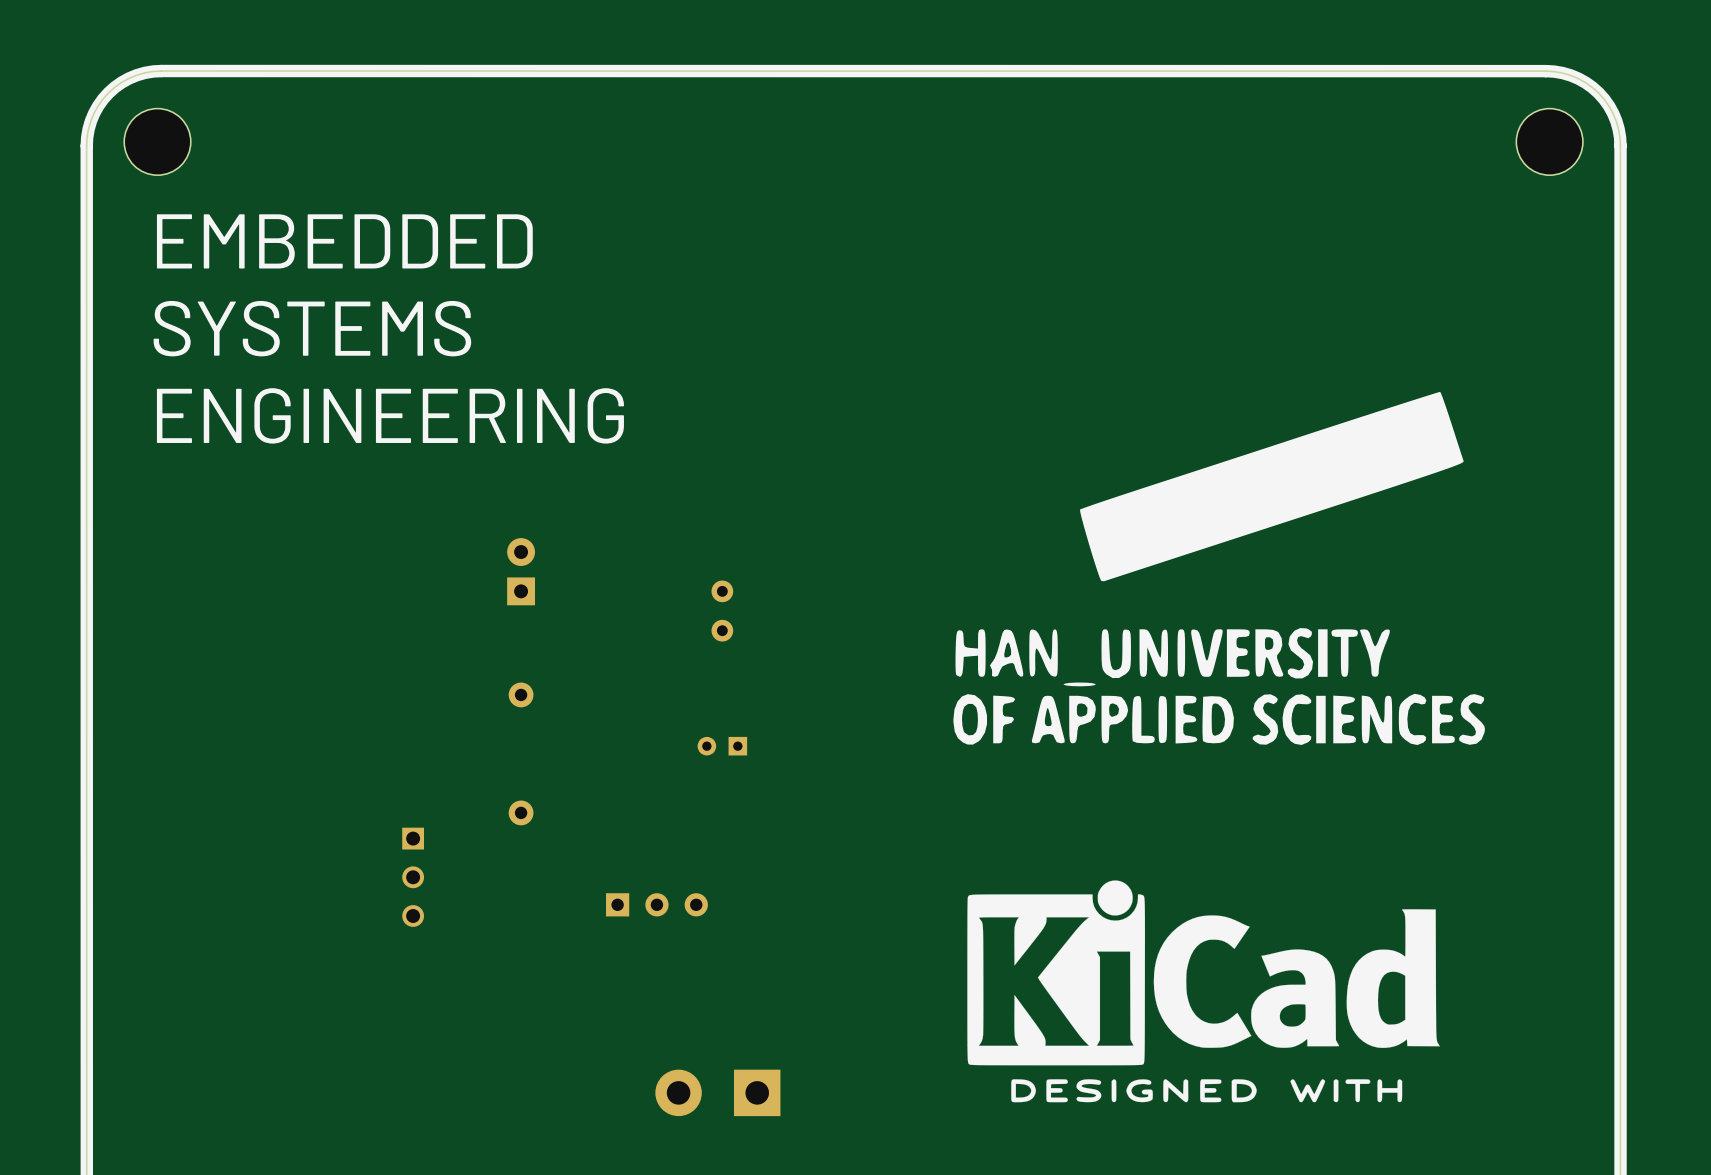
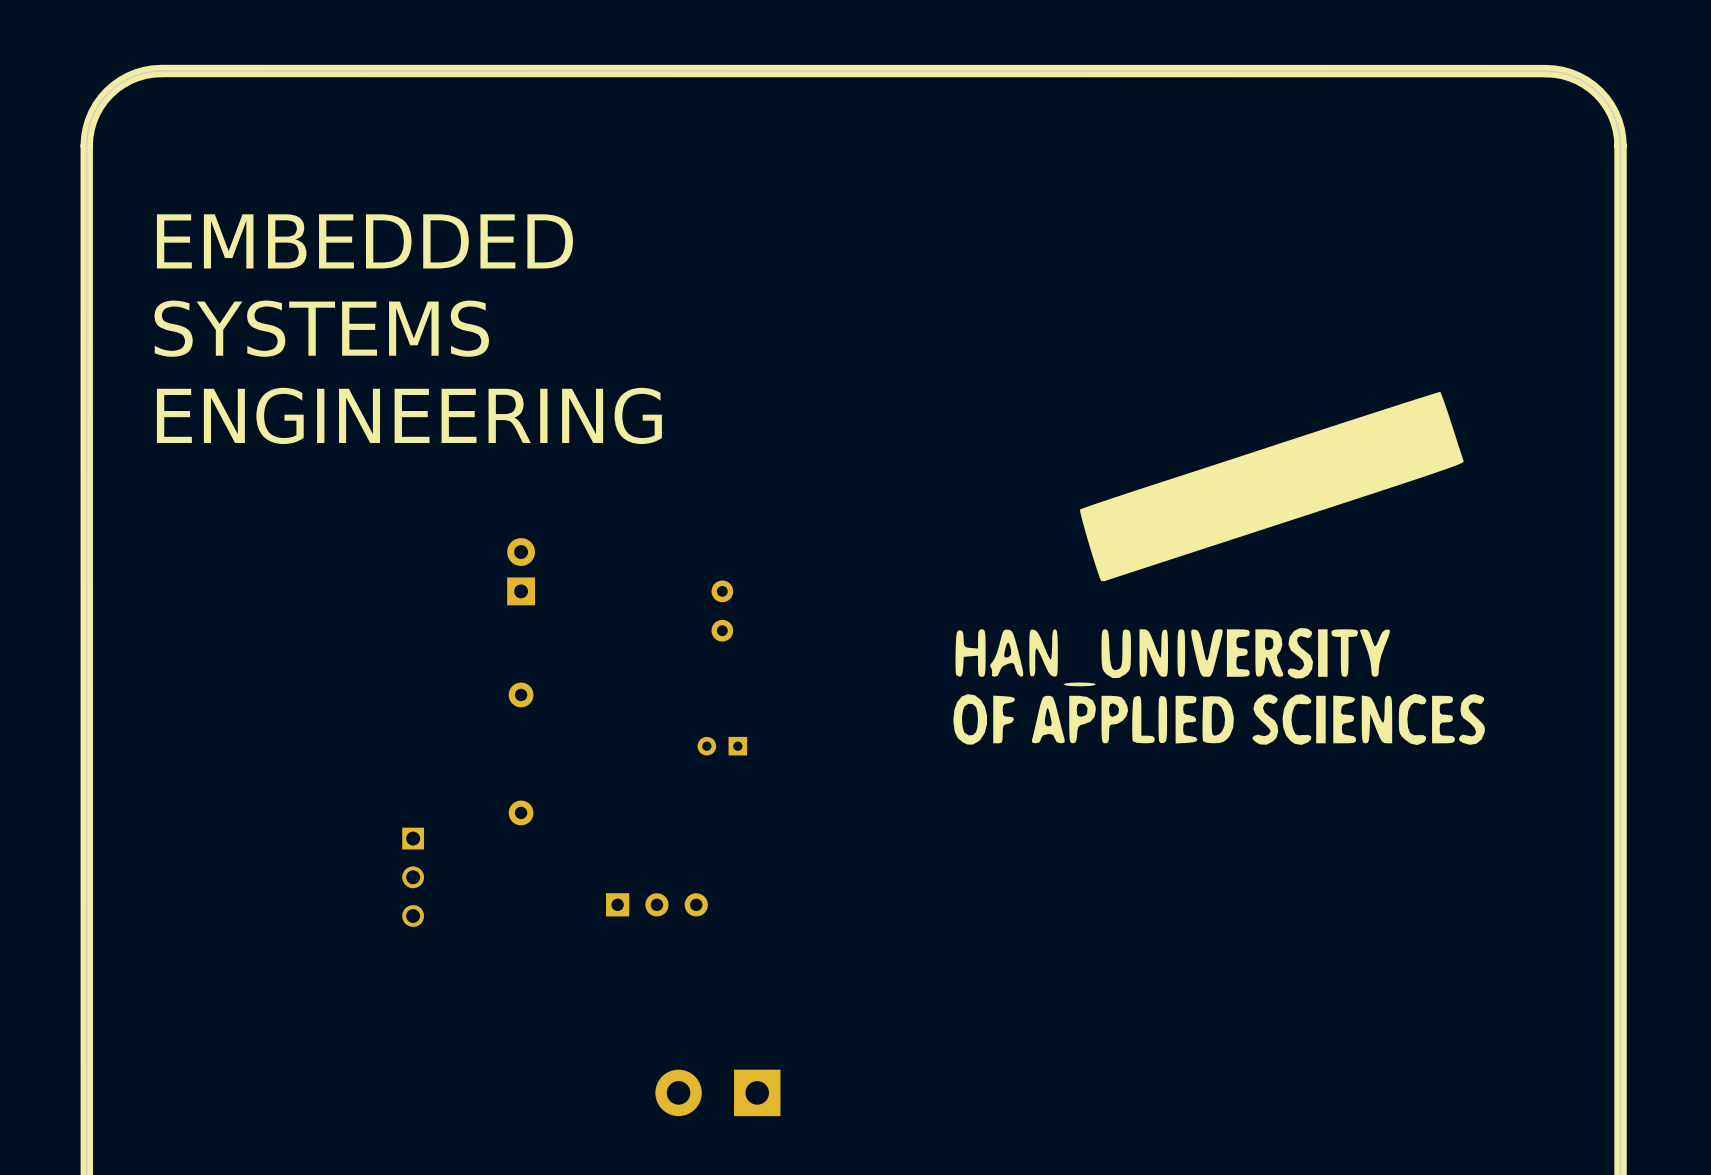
part: (157, 141) -> none
part: (1549, 141) -> none
drawing: [967, 880, 1440, 1103] -> none

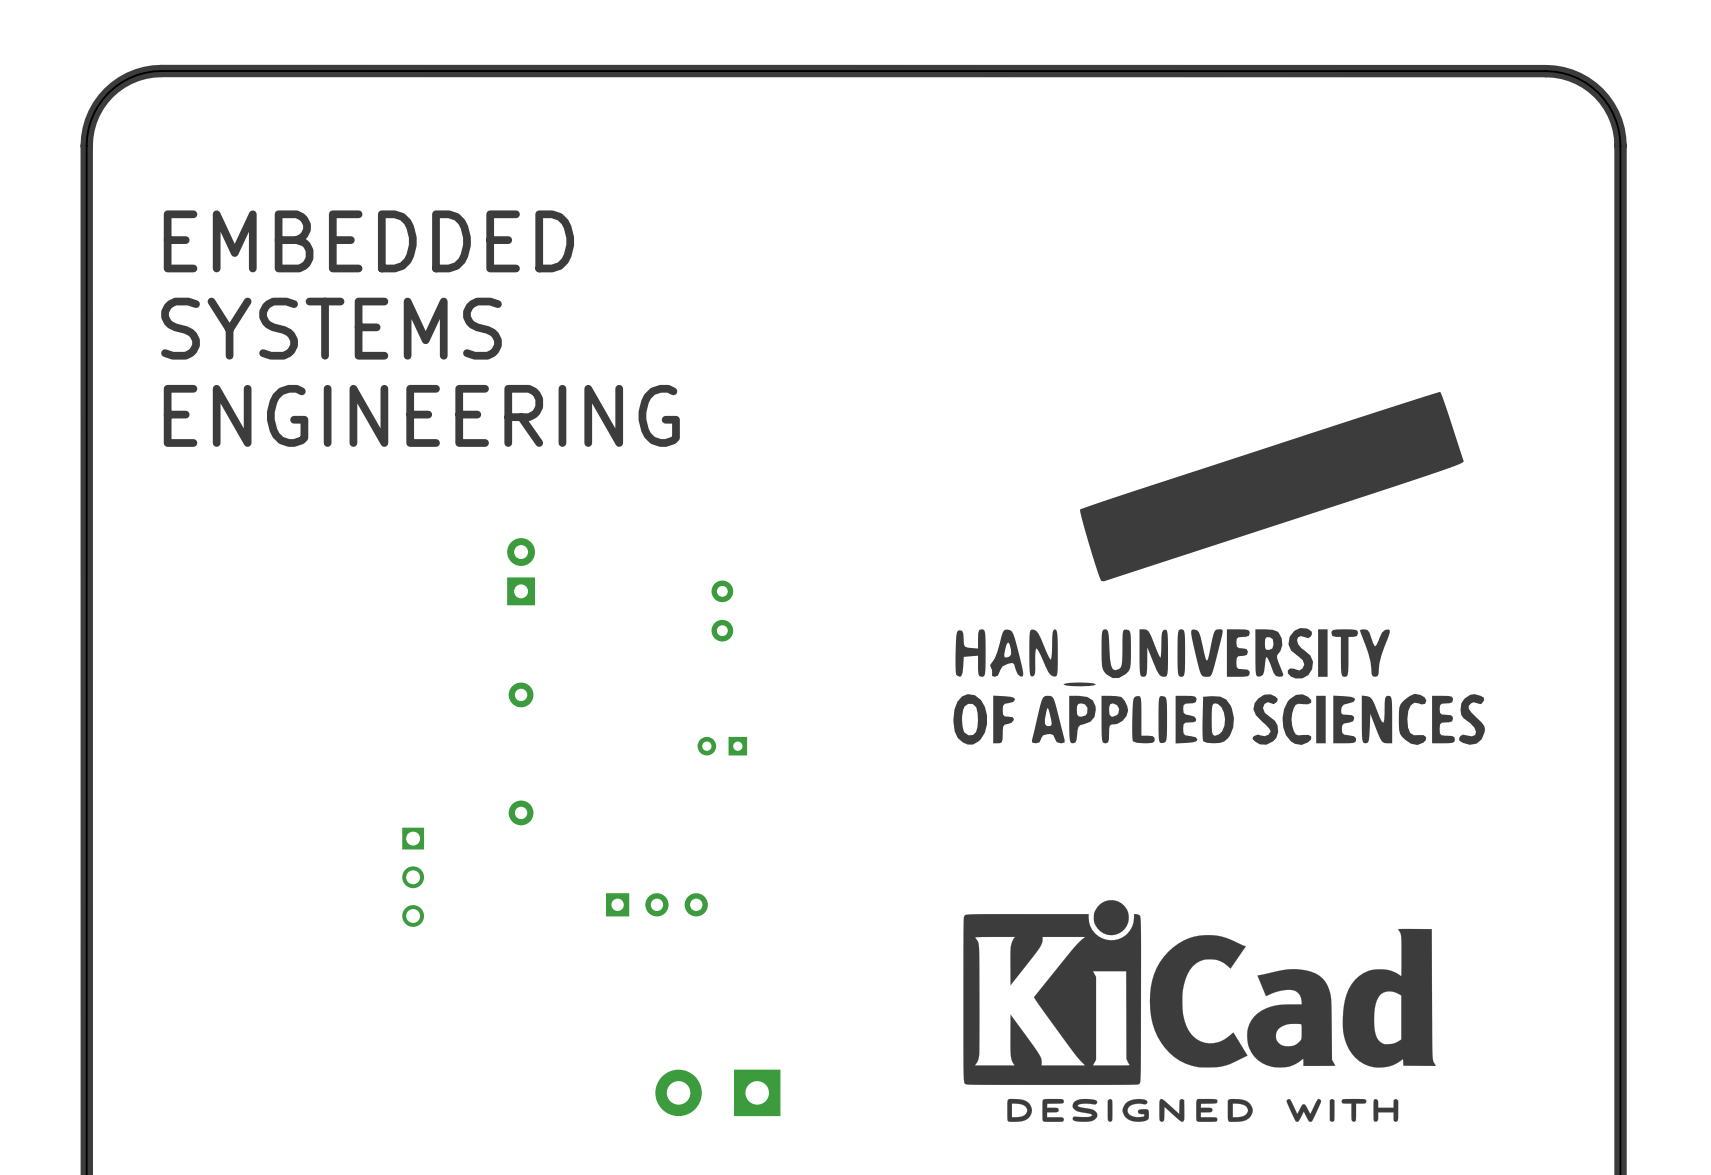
drawing: none -> [963, 900, 1436, 1122]

